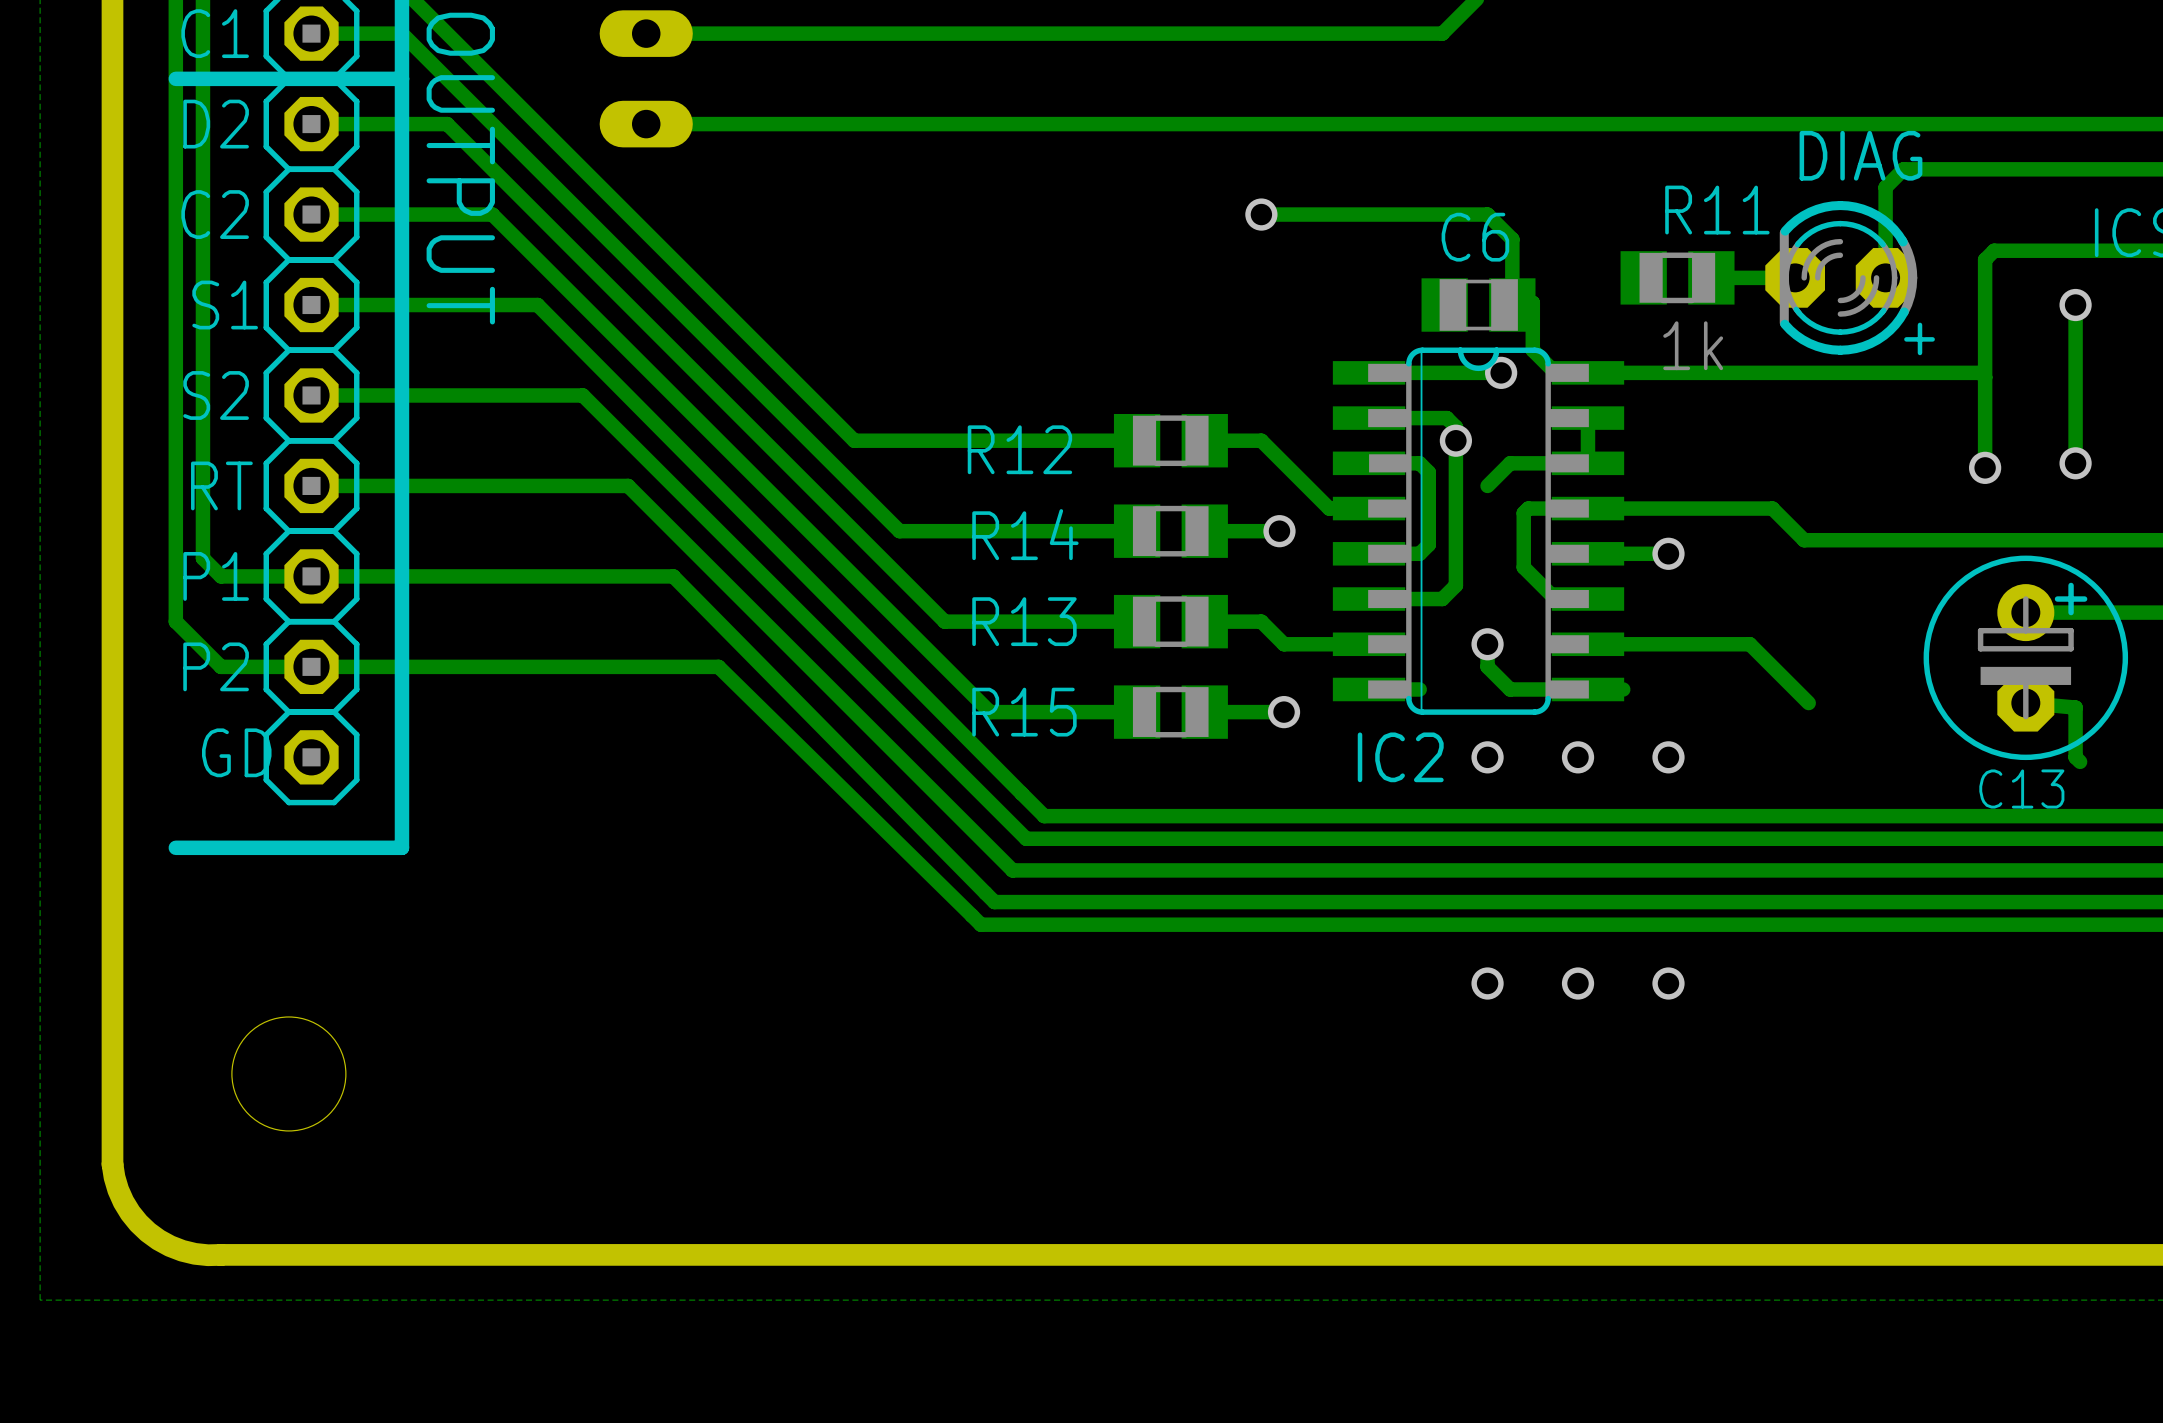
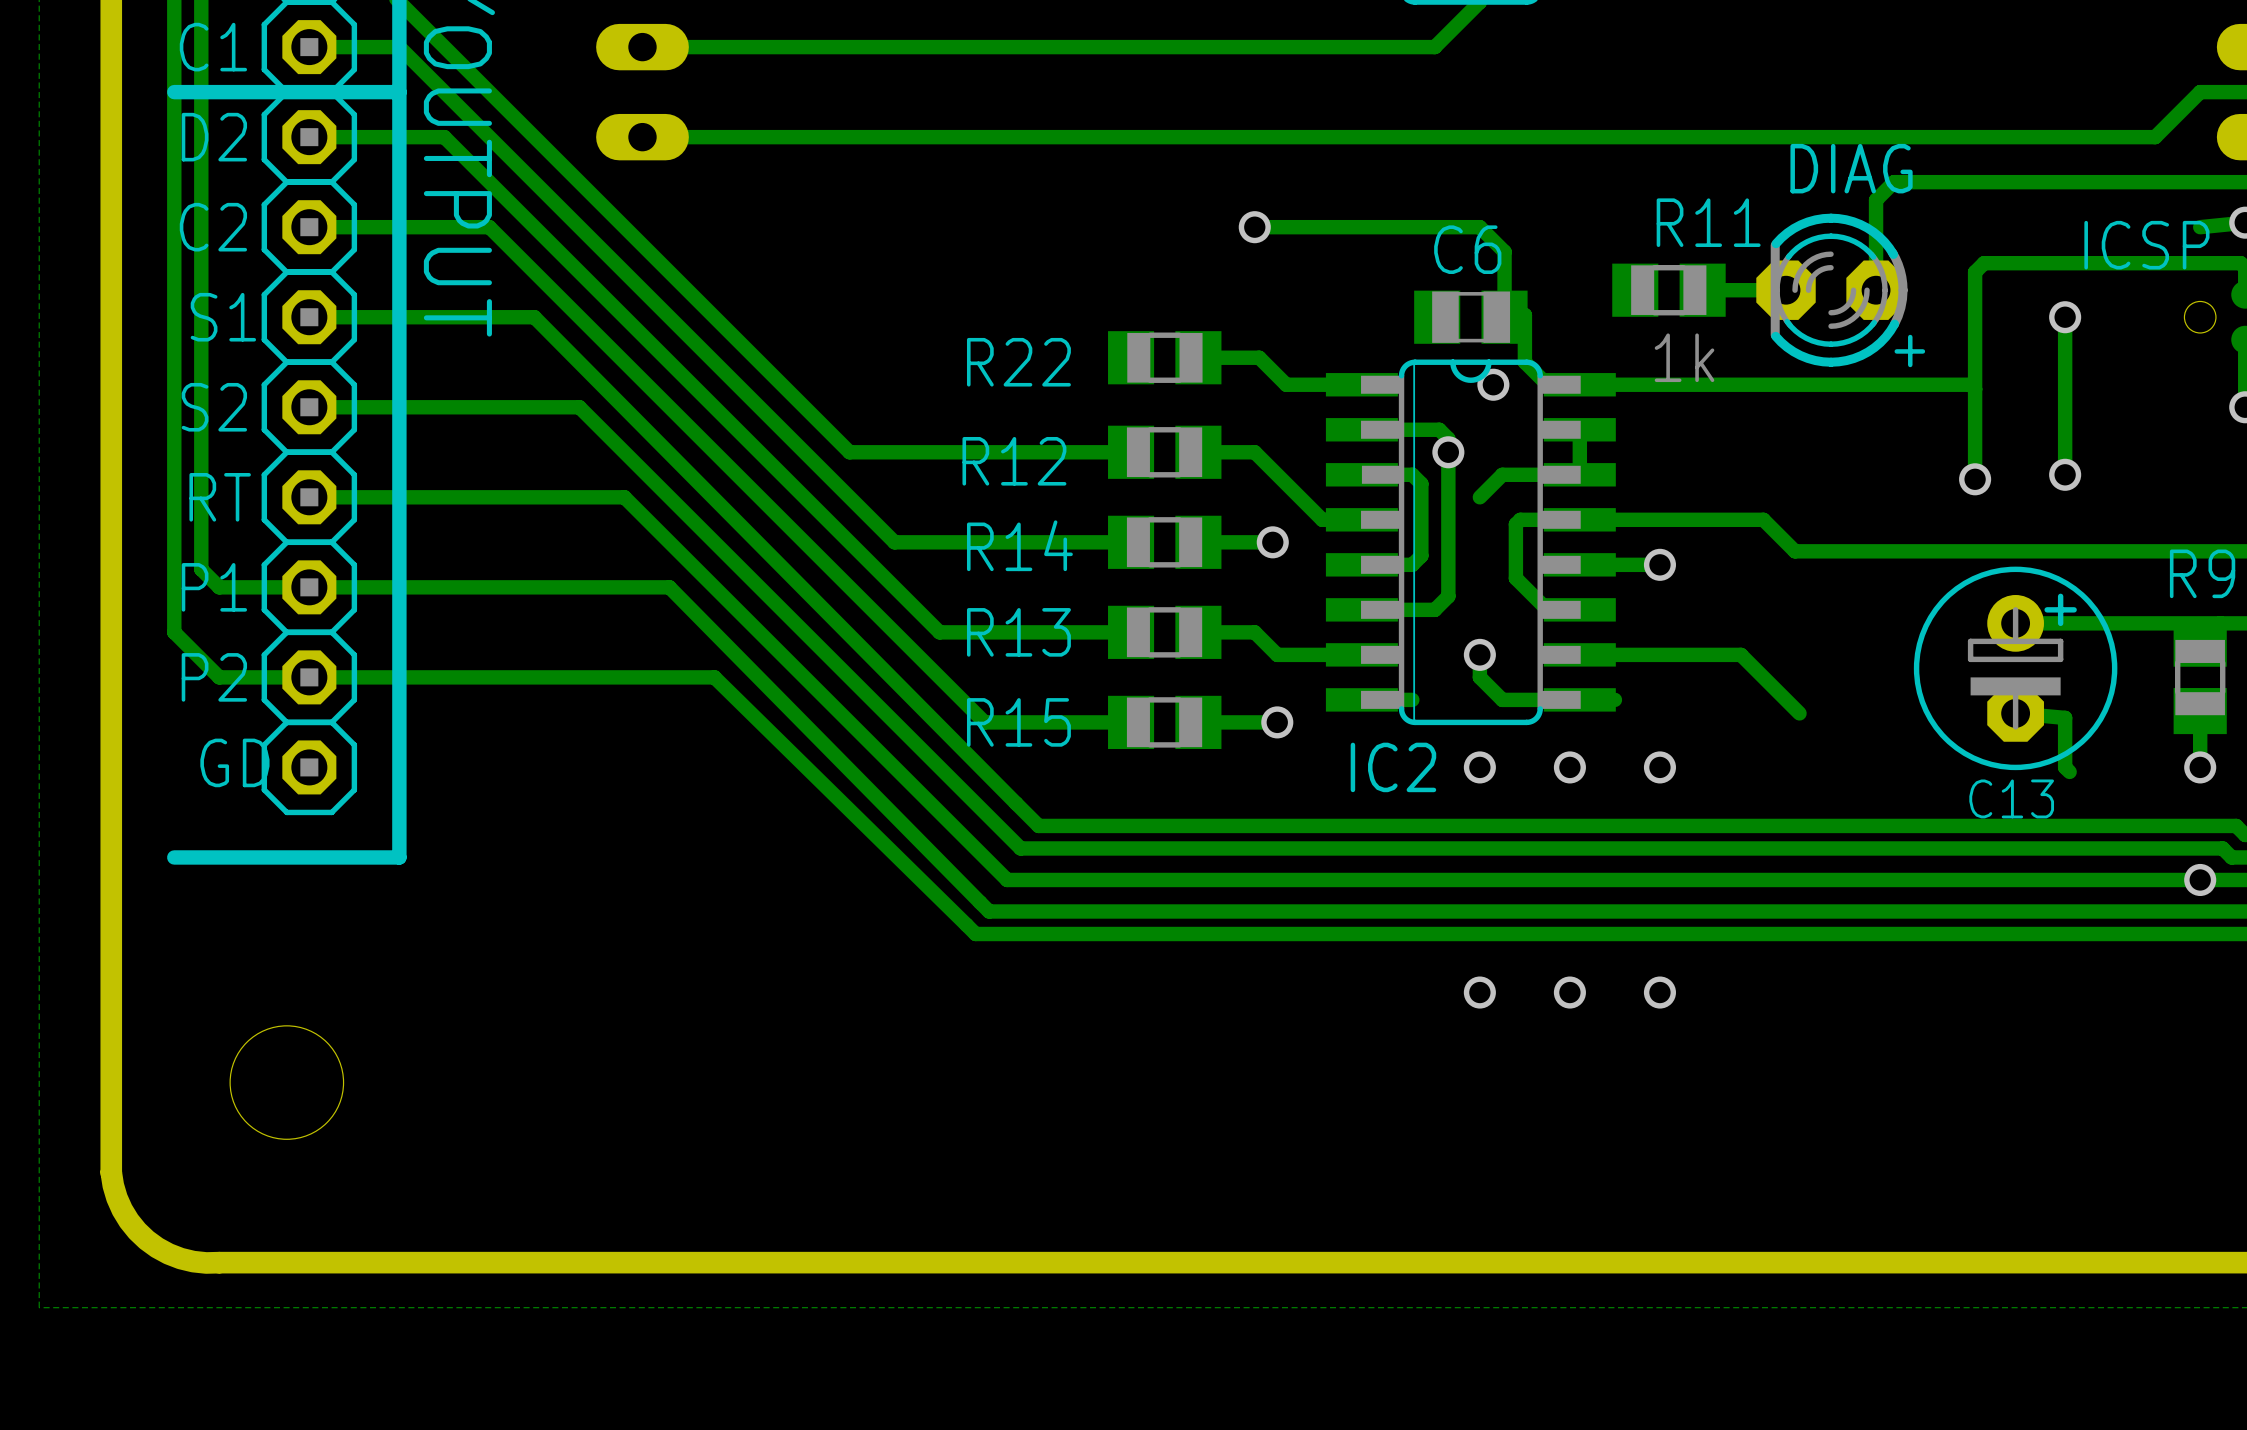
R22: none -> (1164, 357)
track: (1501, 372) (1369, 372) -> (1198, 357) (1259, 357) (1286, 384) (1361, 384)

